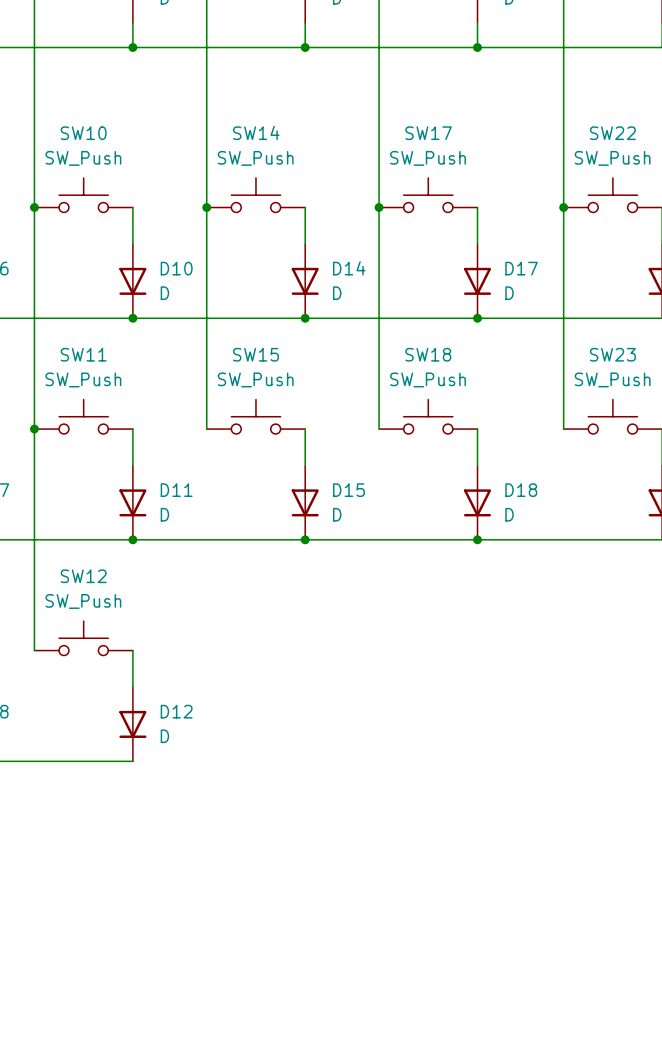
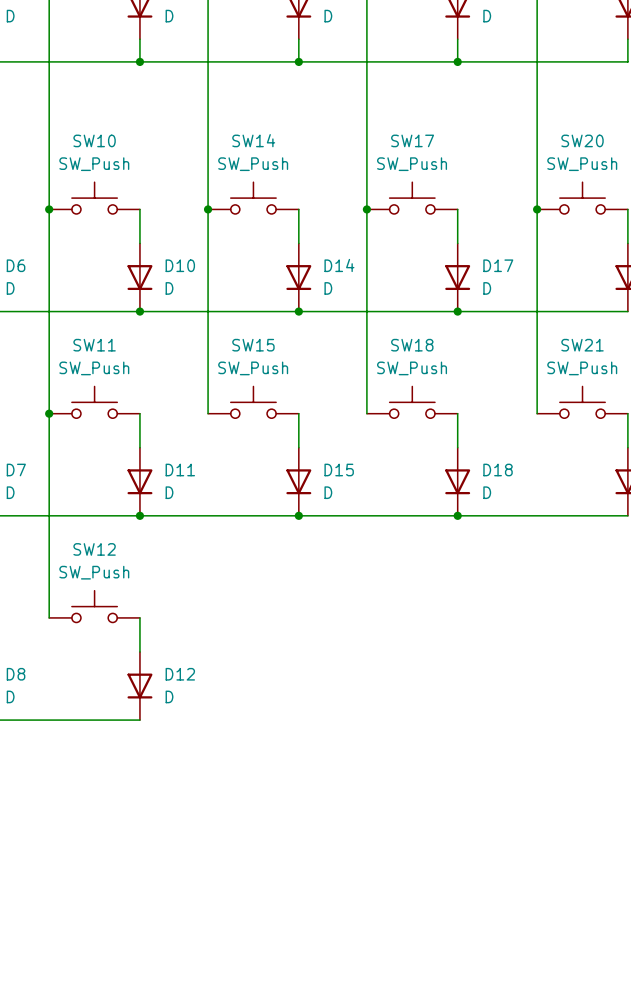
SW22 name: SW22 (612, 133) -> SW20 (582, 140)
SW23 name: SW23 (612, 354) -> SW21 (582, 345)

